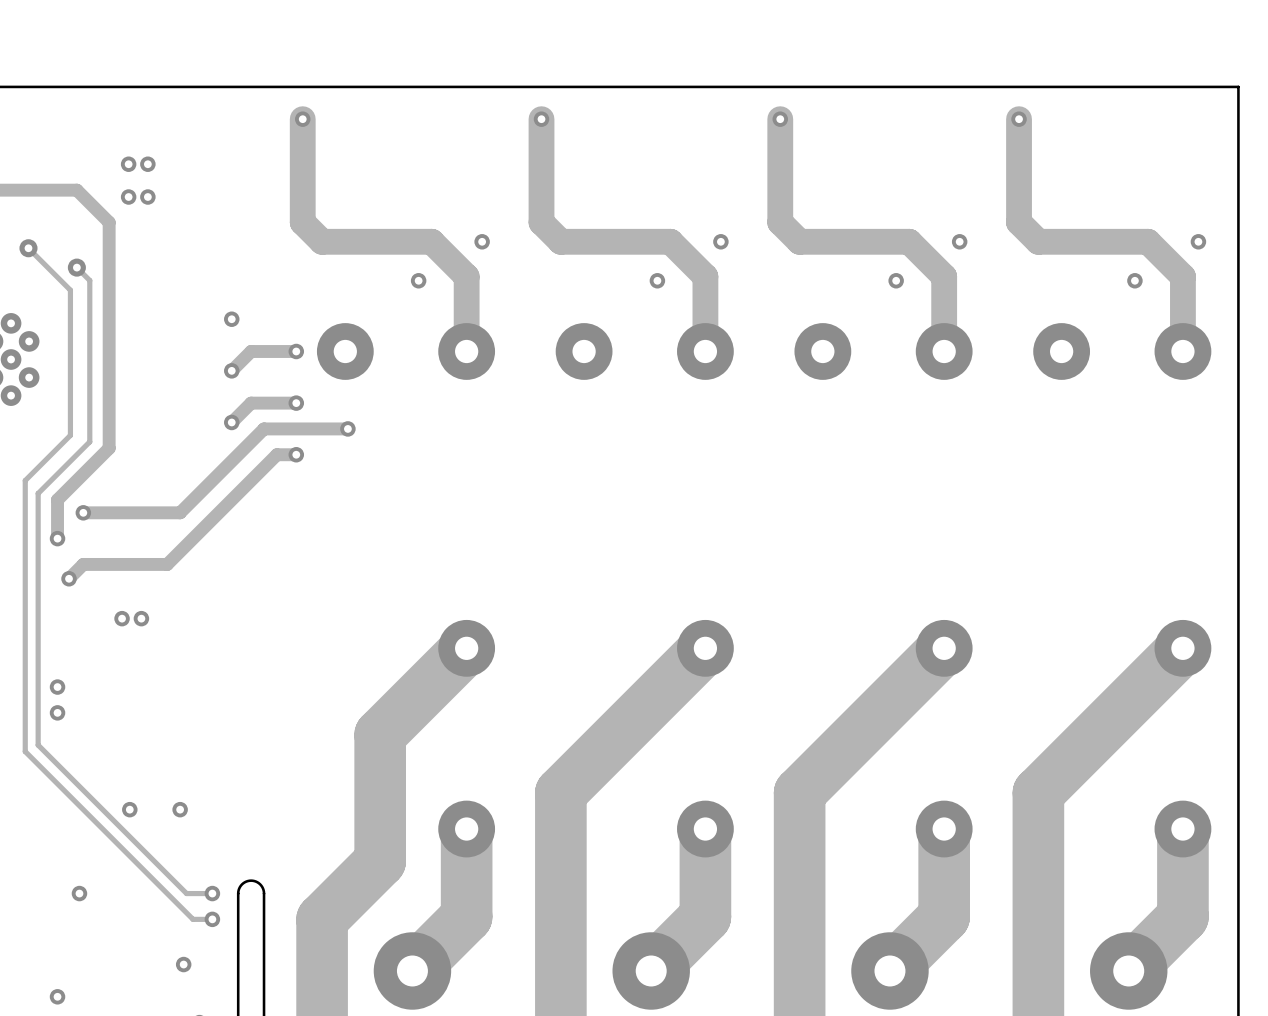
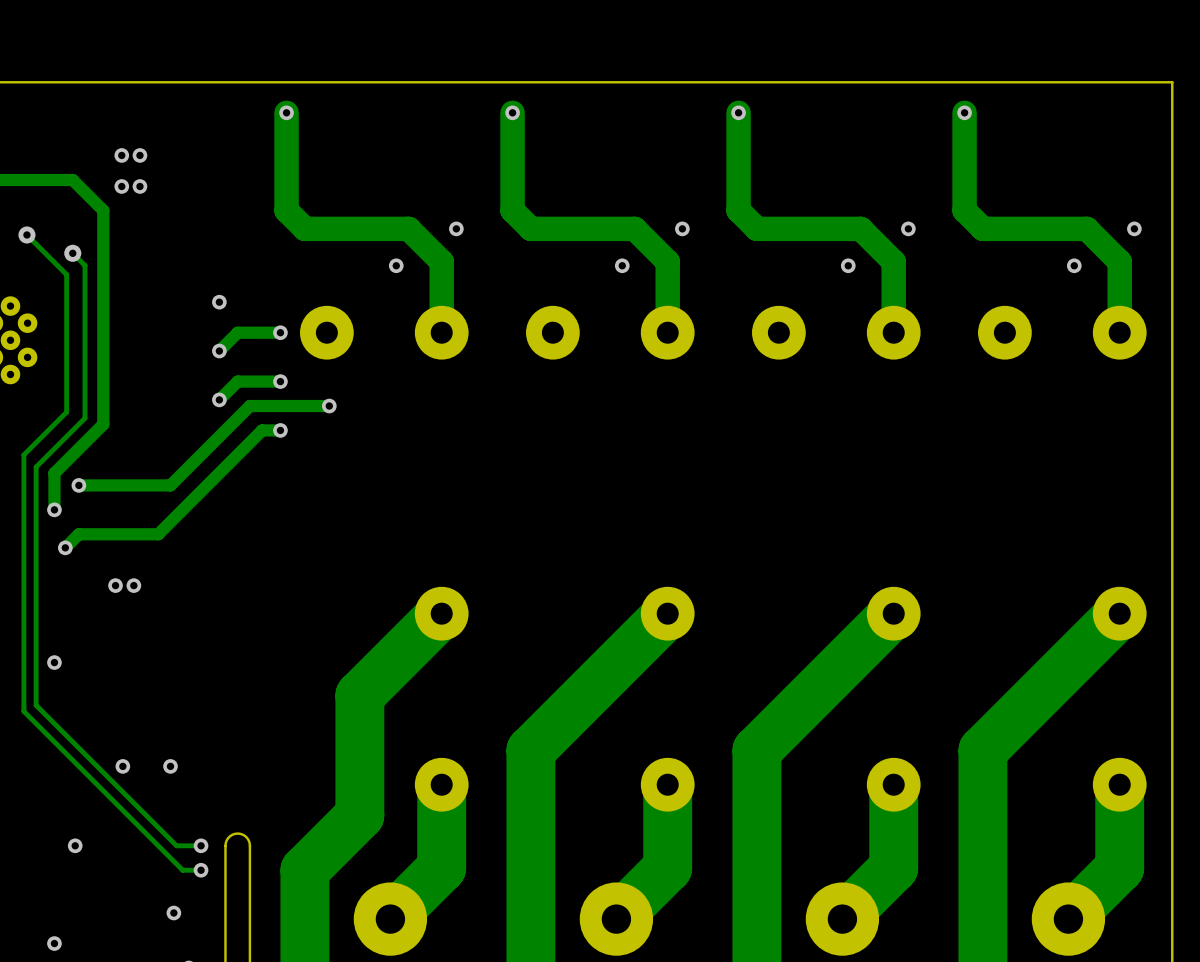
via: (57, 687) -> none
via: none -> (54, 662)
via: (57, 712) -> none

